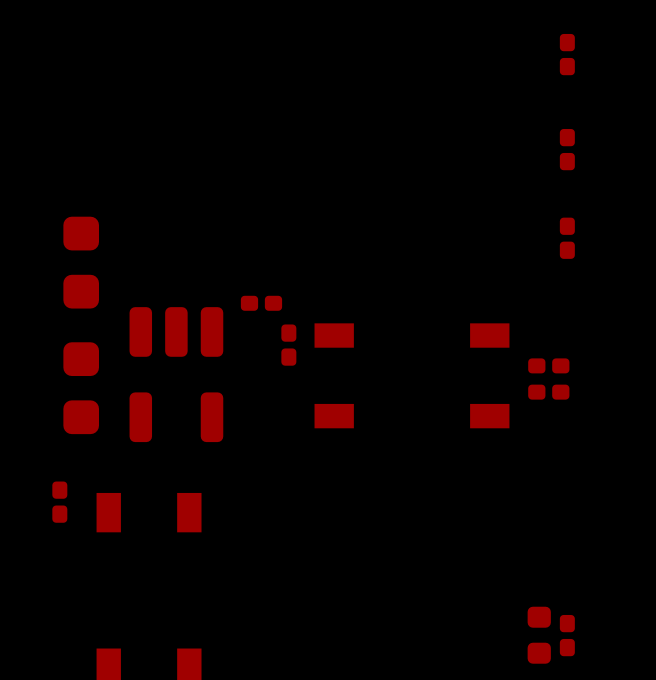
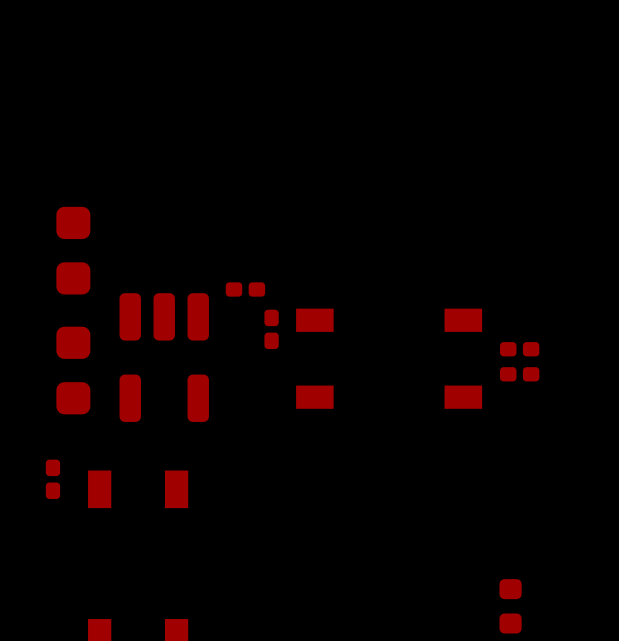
part: (567, 54) -> none
part: (567, 149) -> none
part: (567, 238) -> none
part: (567, 635) -> none

